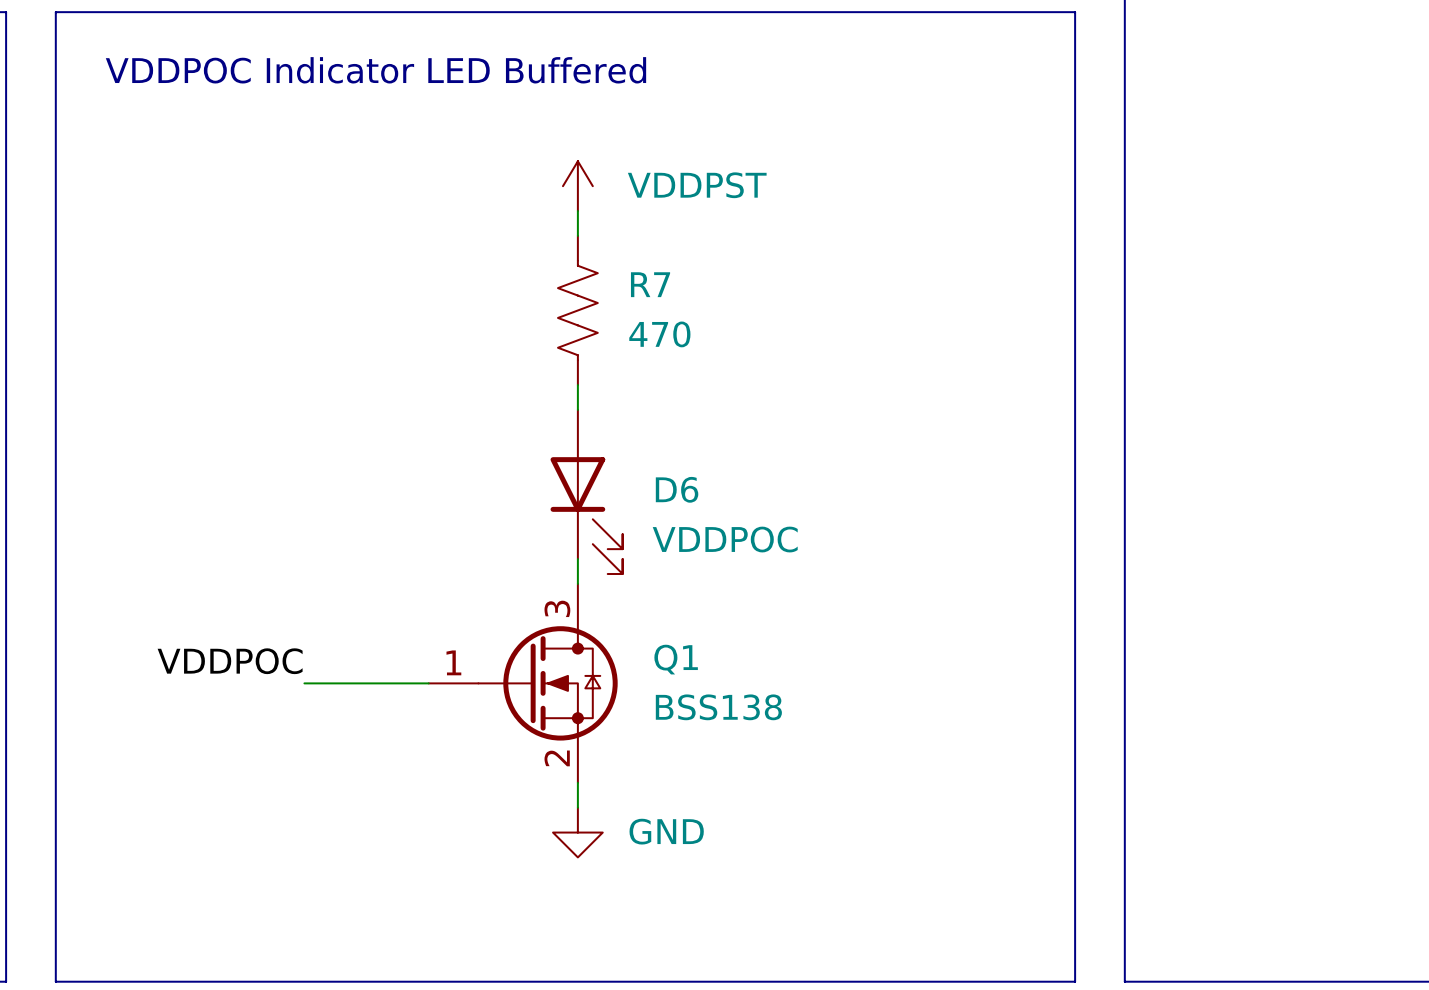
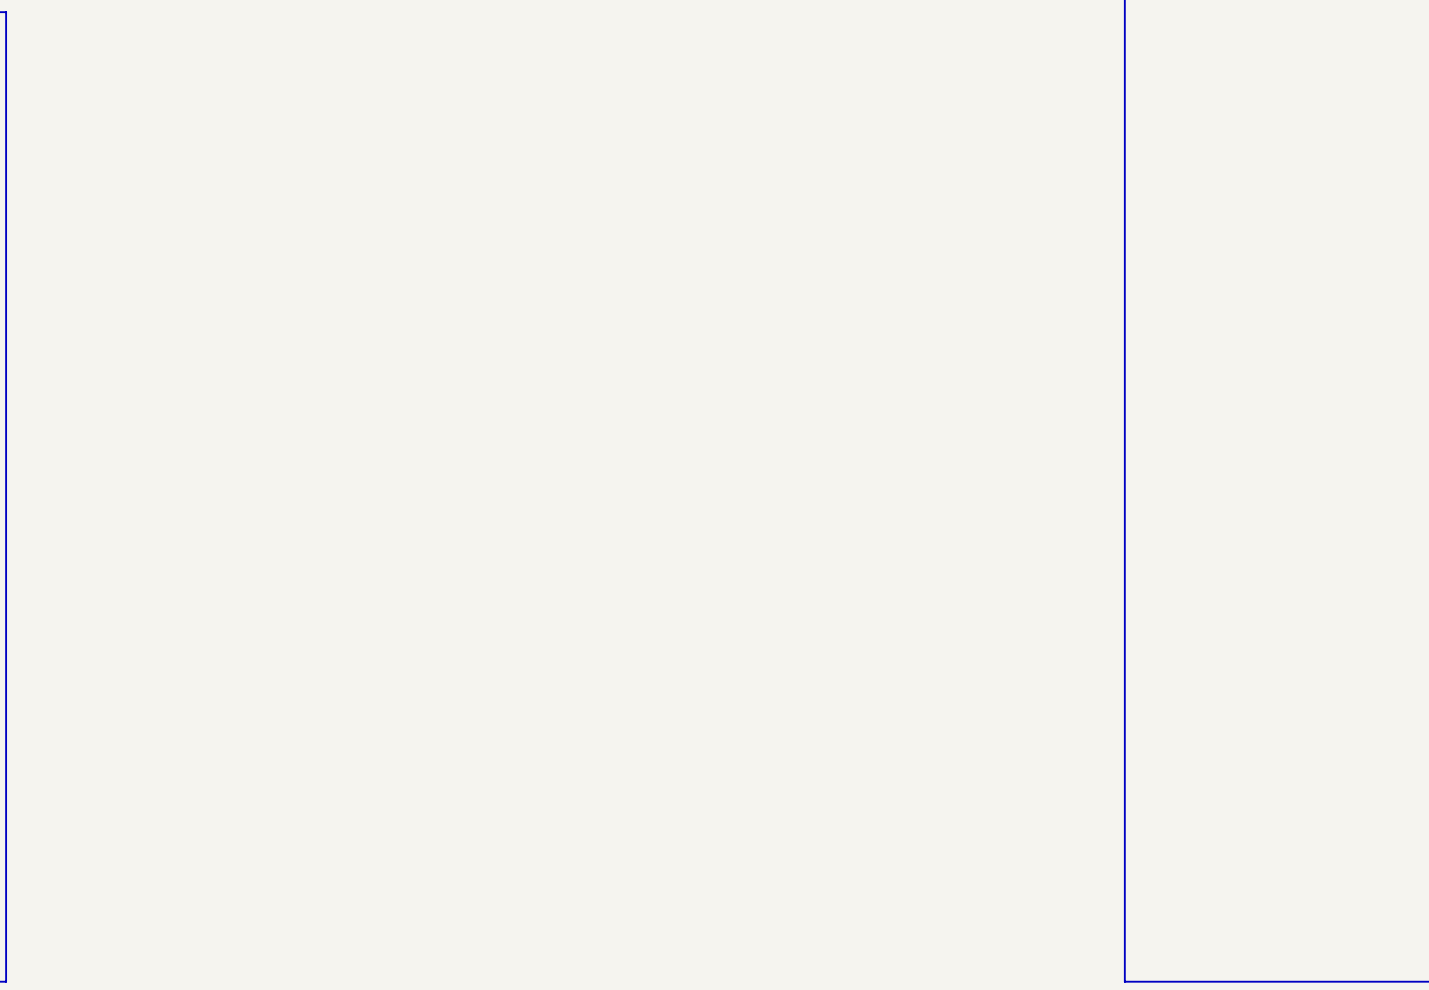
line: (55, 12) (1075, 12) (1075, 981) (55, 981) (55, 12) -> none
text: VDDPOC Indicator LED Buffered (375, 70) -> none
power symbol: VDDPST (577, 186) -> none
wire: (577, 211) (577, 235) -> none
R7: 470 (577, 310) -> none
wire: (577, 385) (577, 409) -> none
D6: VDDPOC (586, 491) -> none
wire: (577, 559) (577, 583) -> none
label: VDDPOC (230, 661) -> none
wire: (304, 683) (428, 683) -> none
Q1: BSS138 (523, 683) -> none
wire: (577, 782) (577, 807) -> none
power symbol: GND (577, 832) -> none

